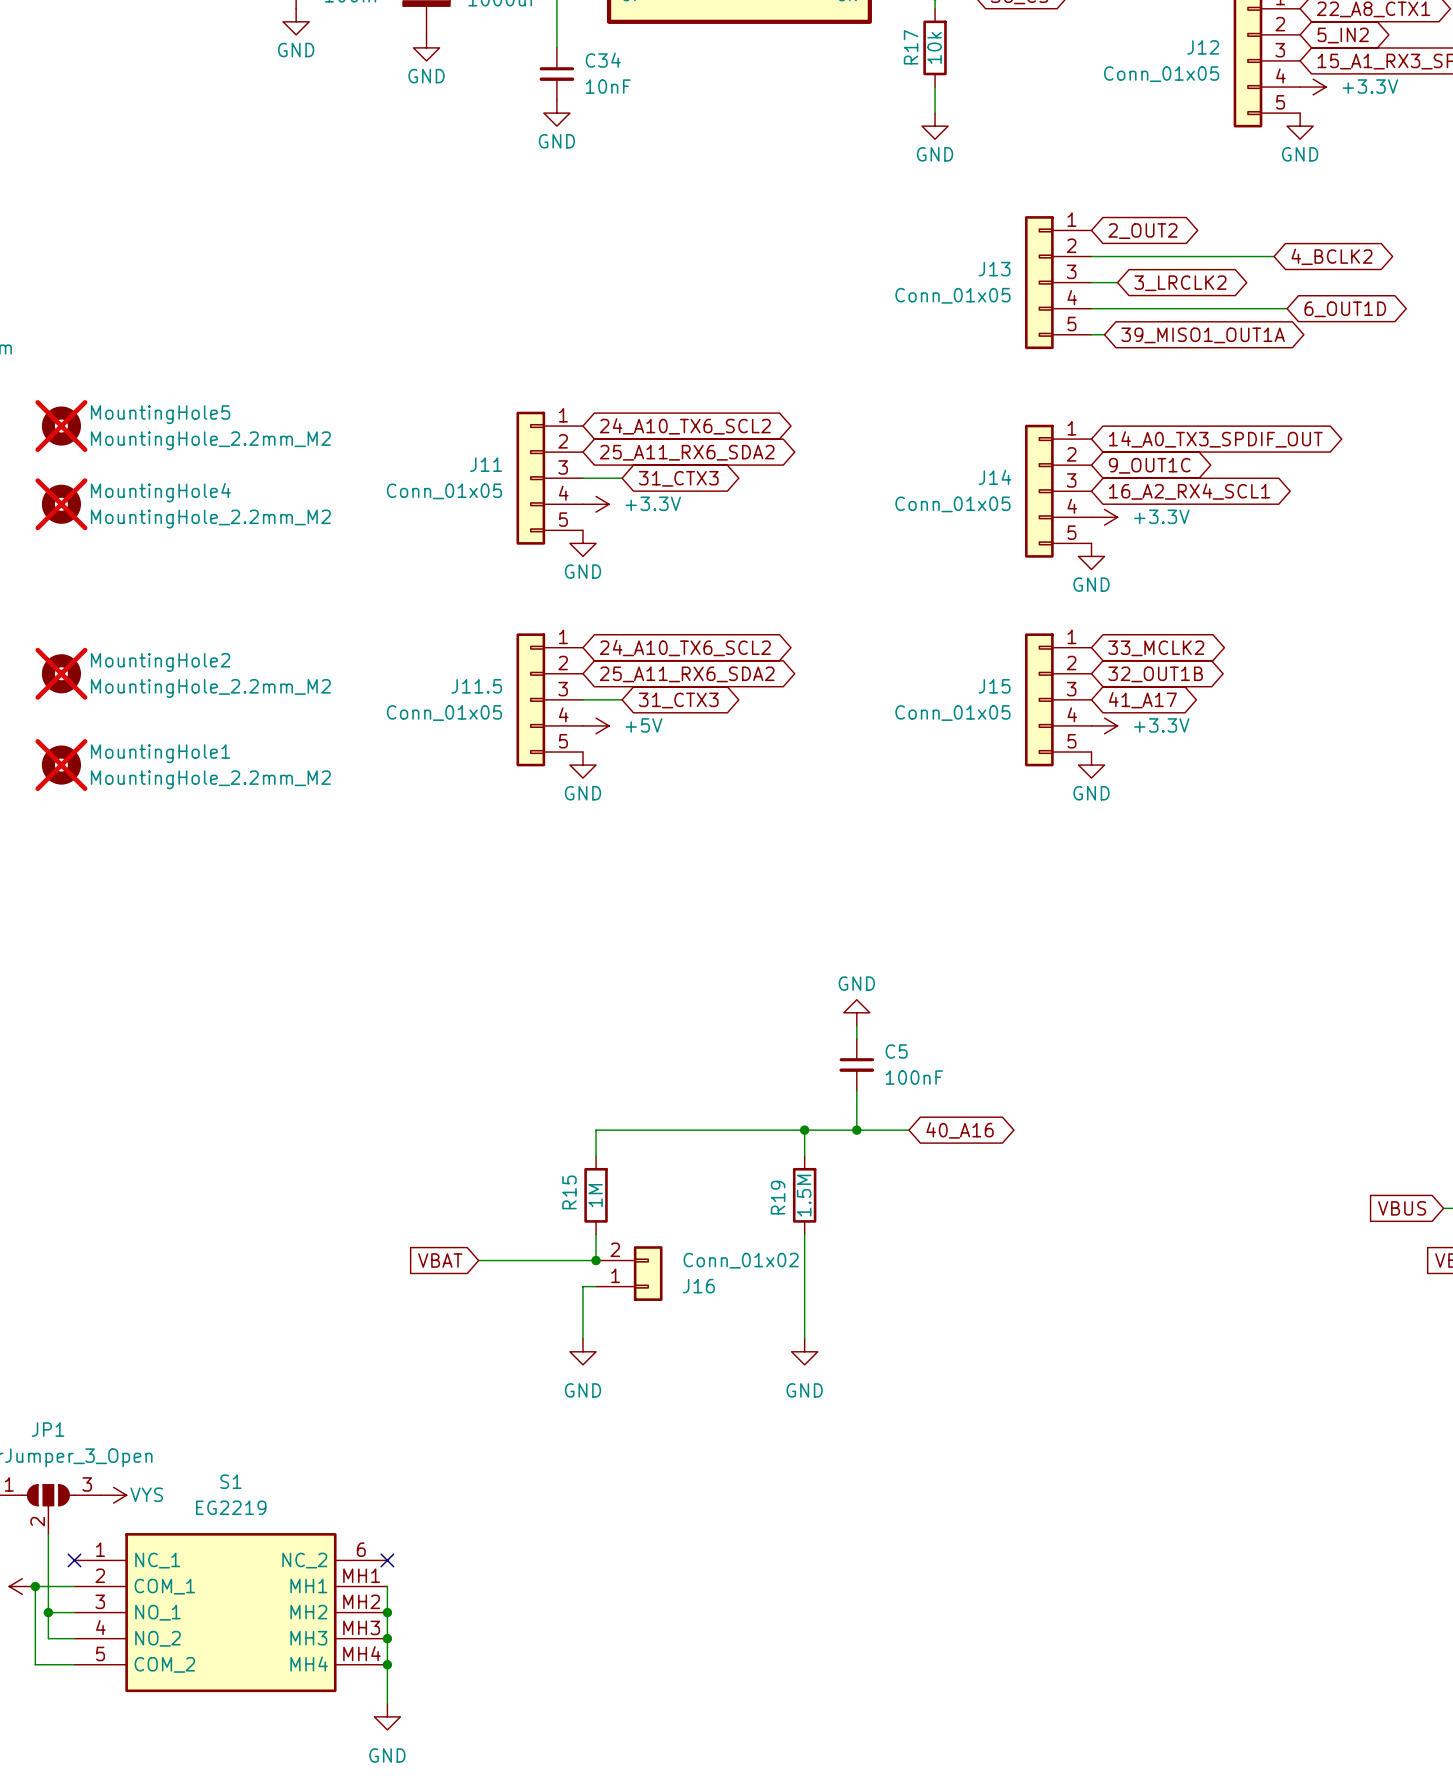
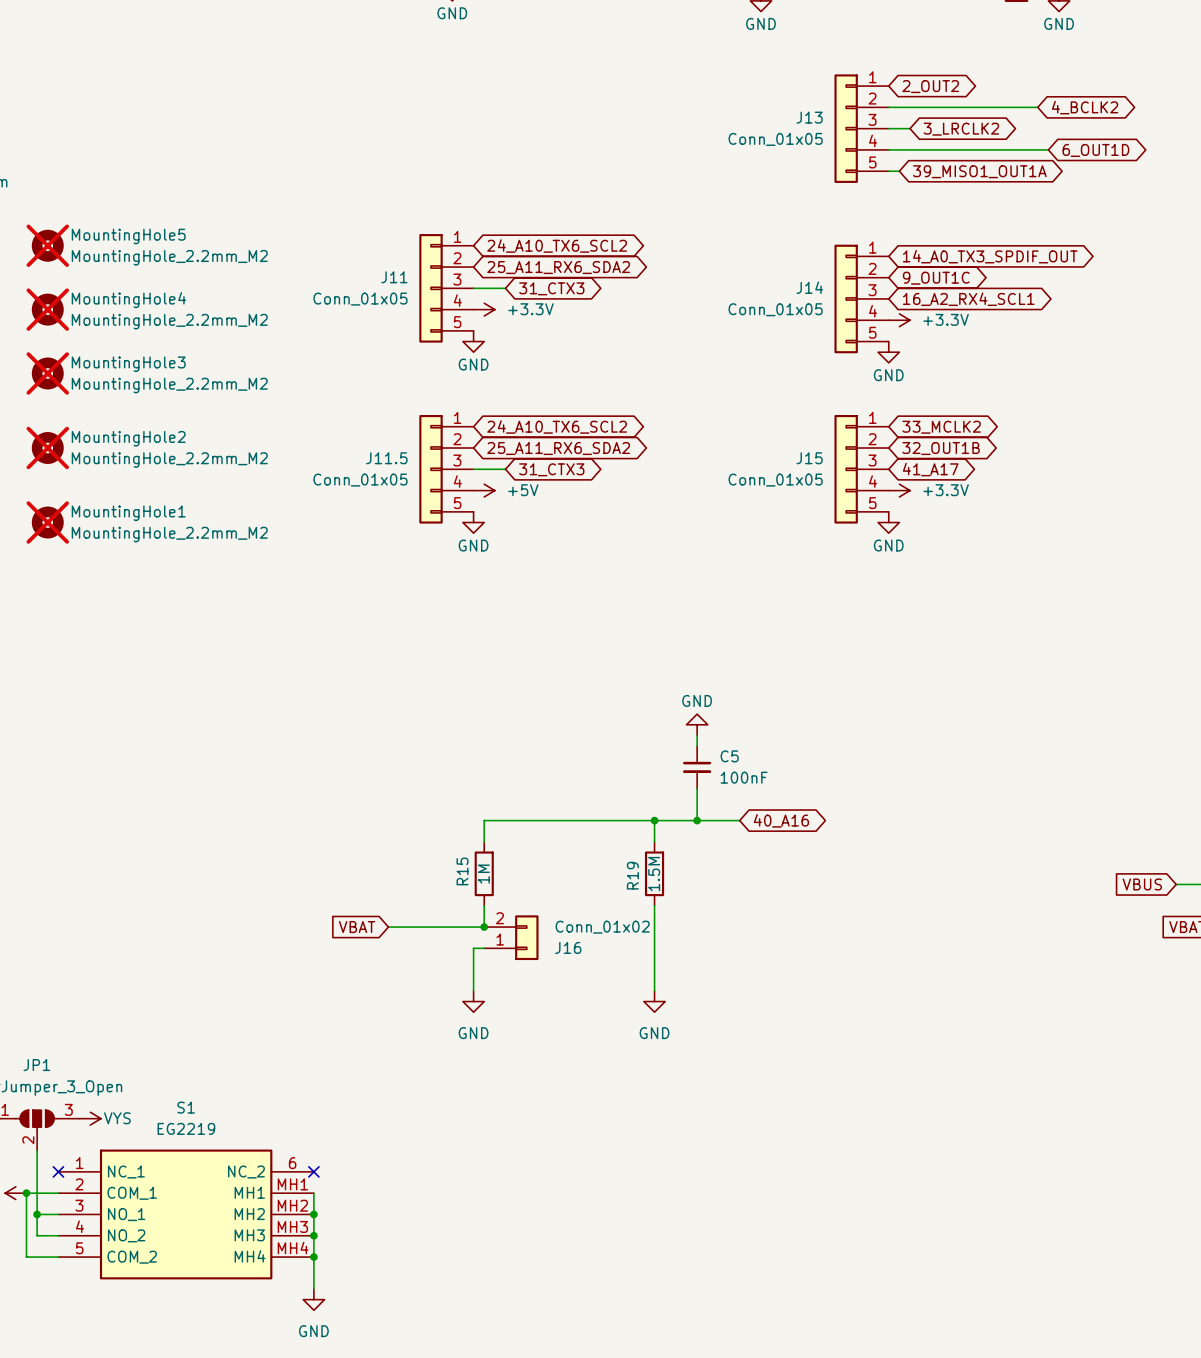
MountingHole3: none -> MountingHole_2.2mm_M2 (47, 373)

